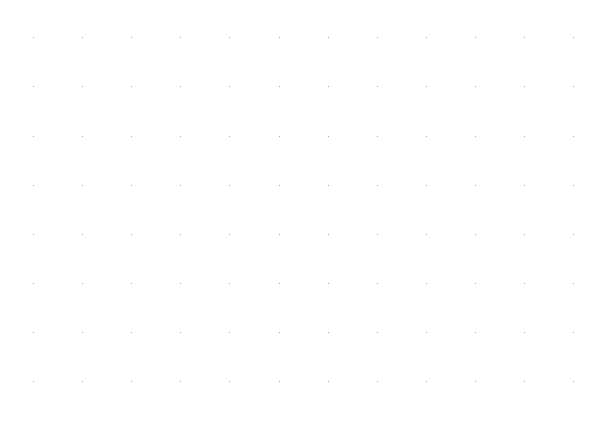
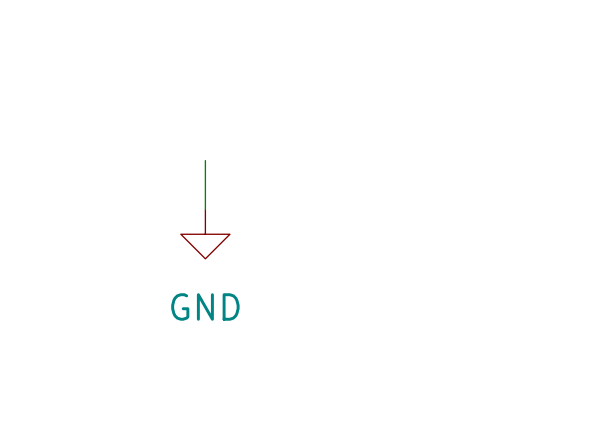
wire: none -> (205, 160) (205, 209)
power symbol: none -> GND (205, 234)

